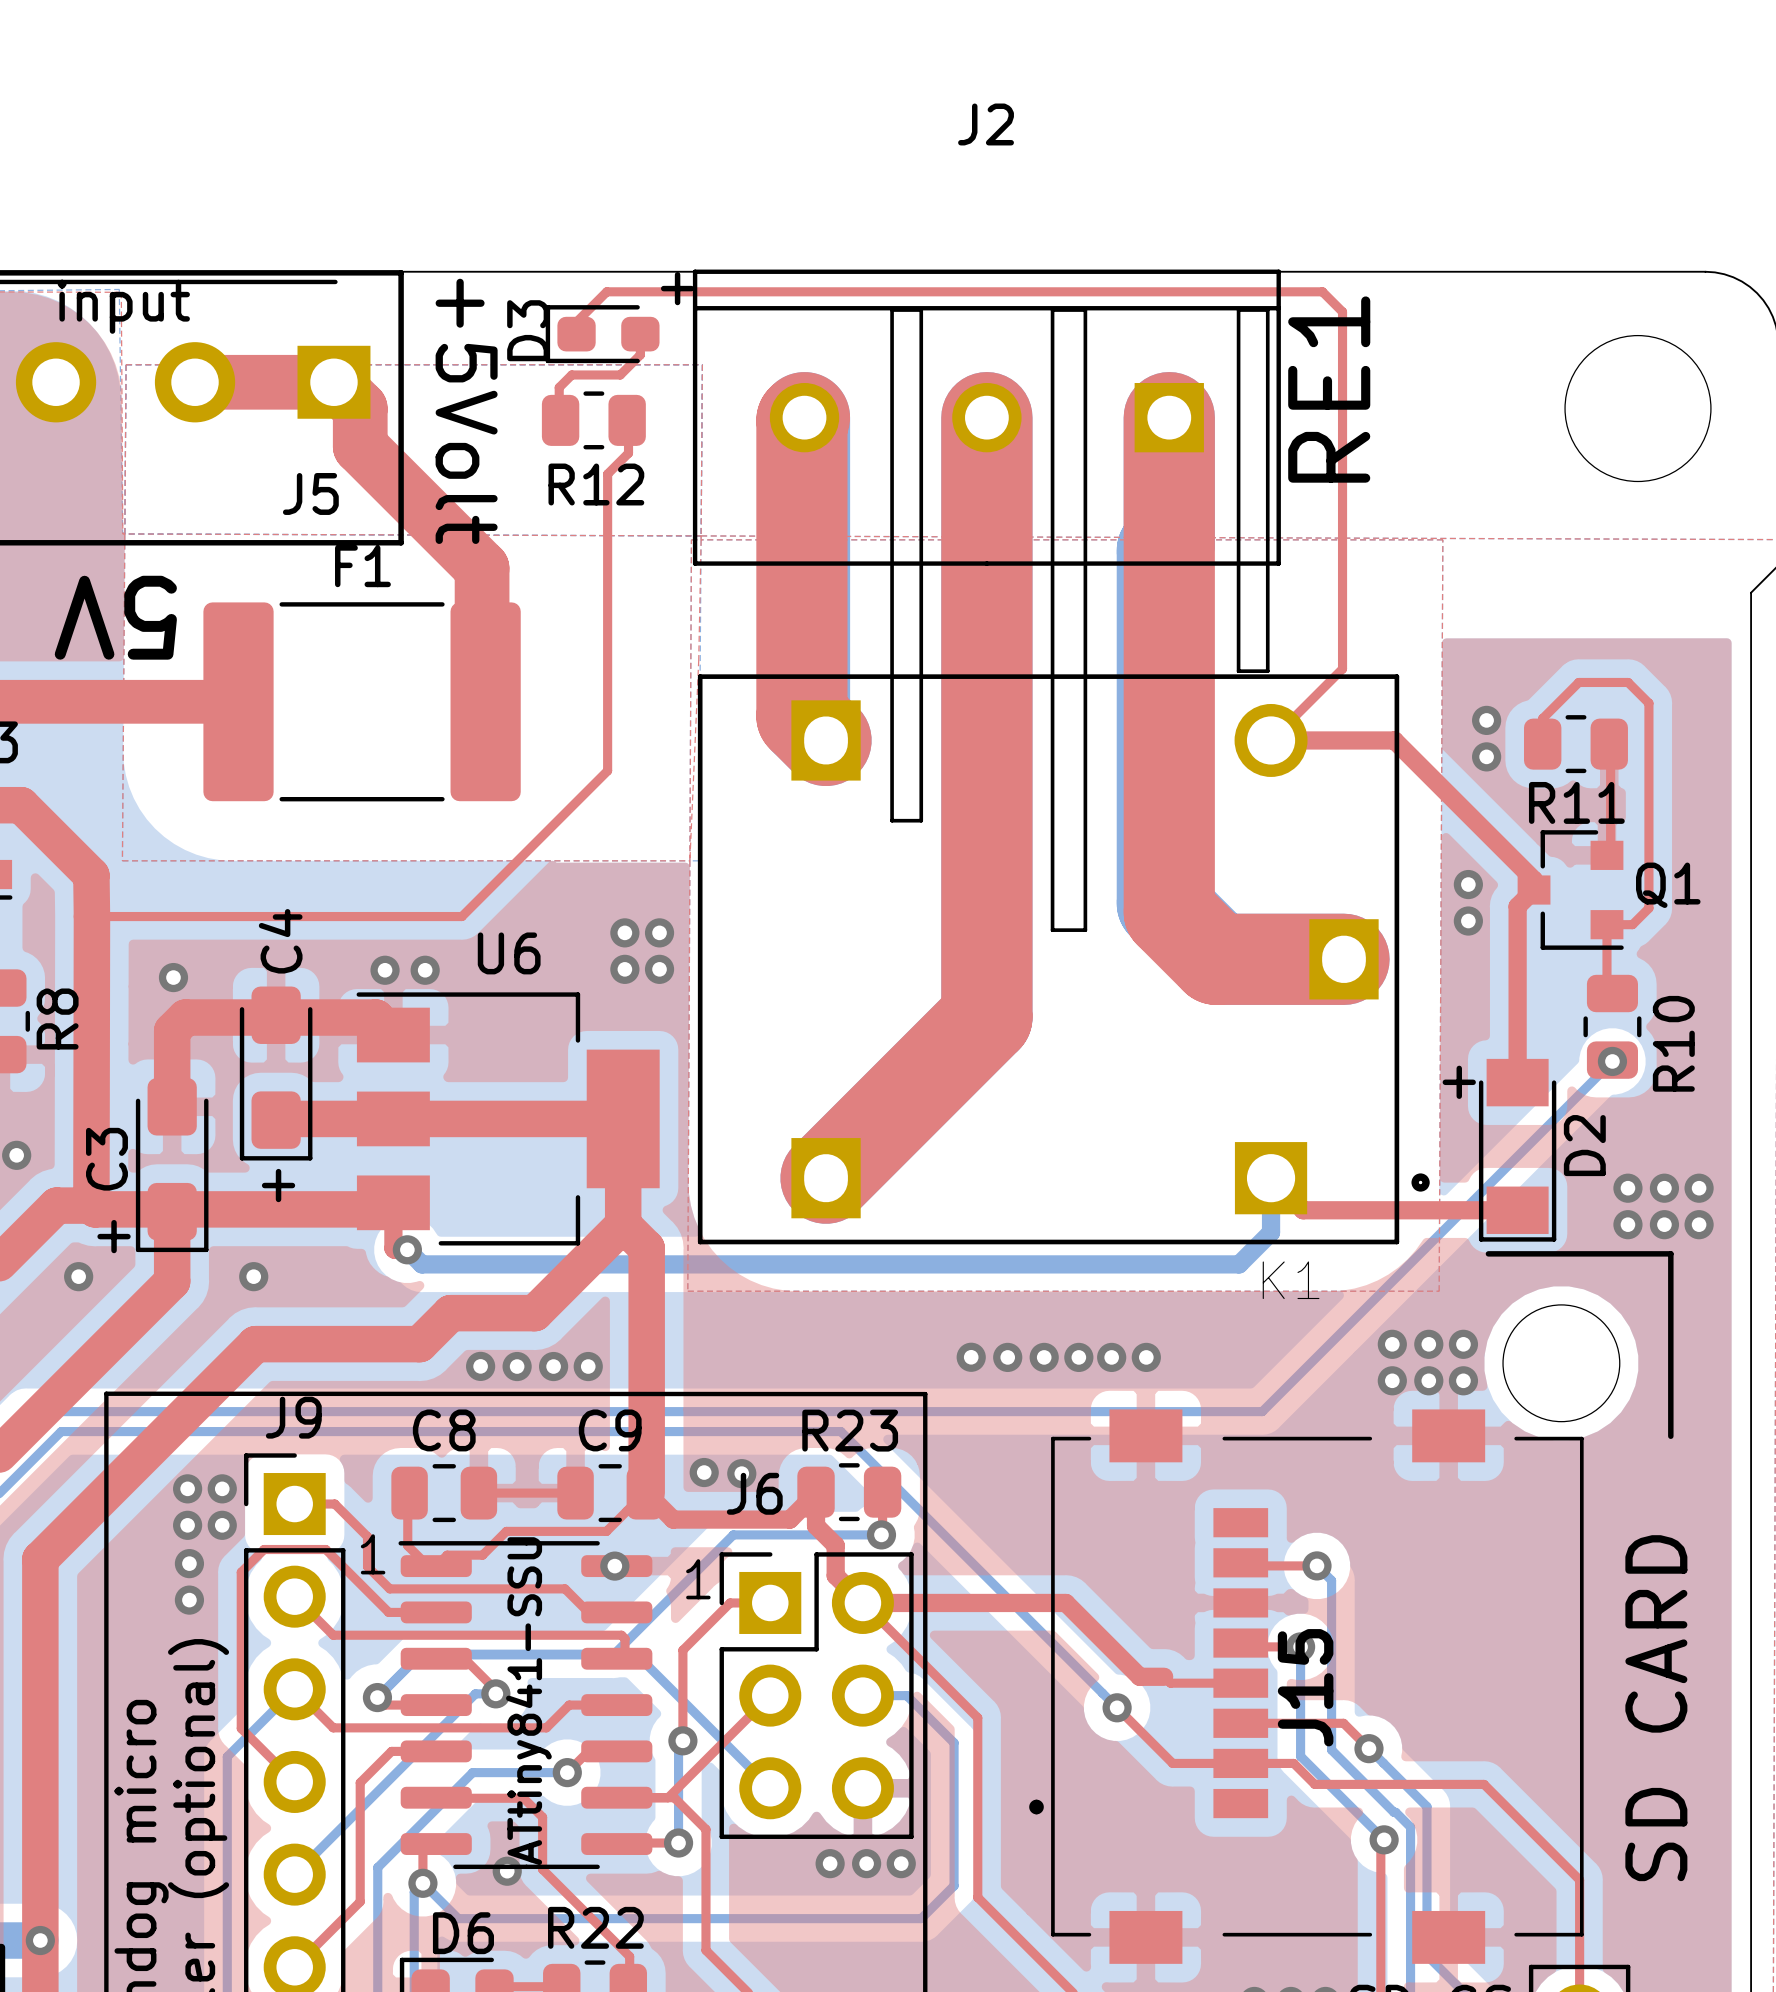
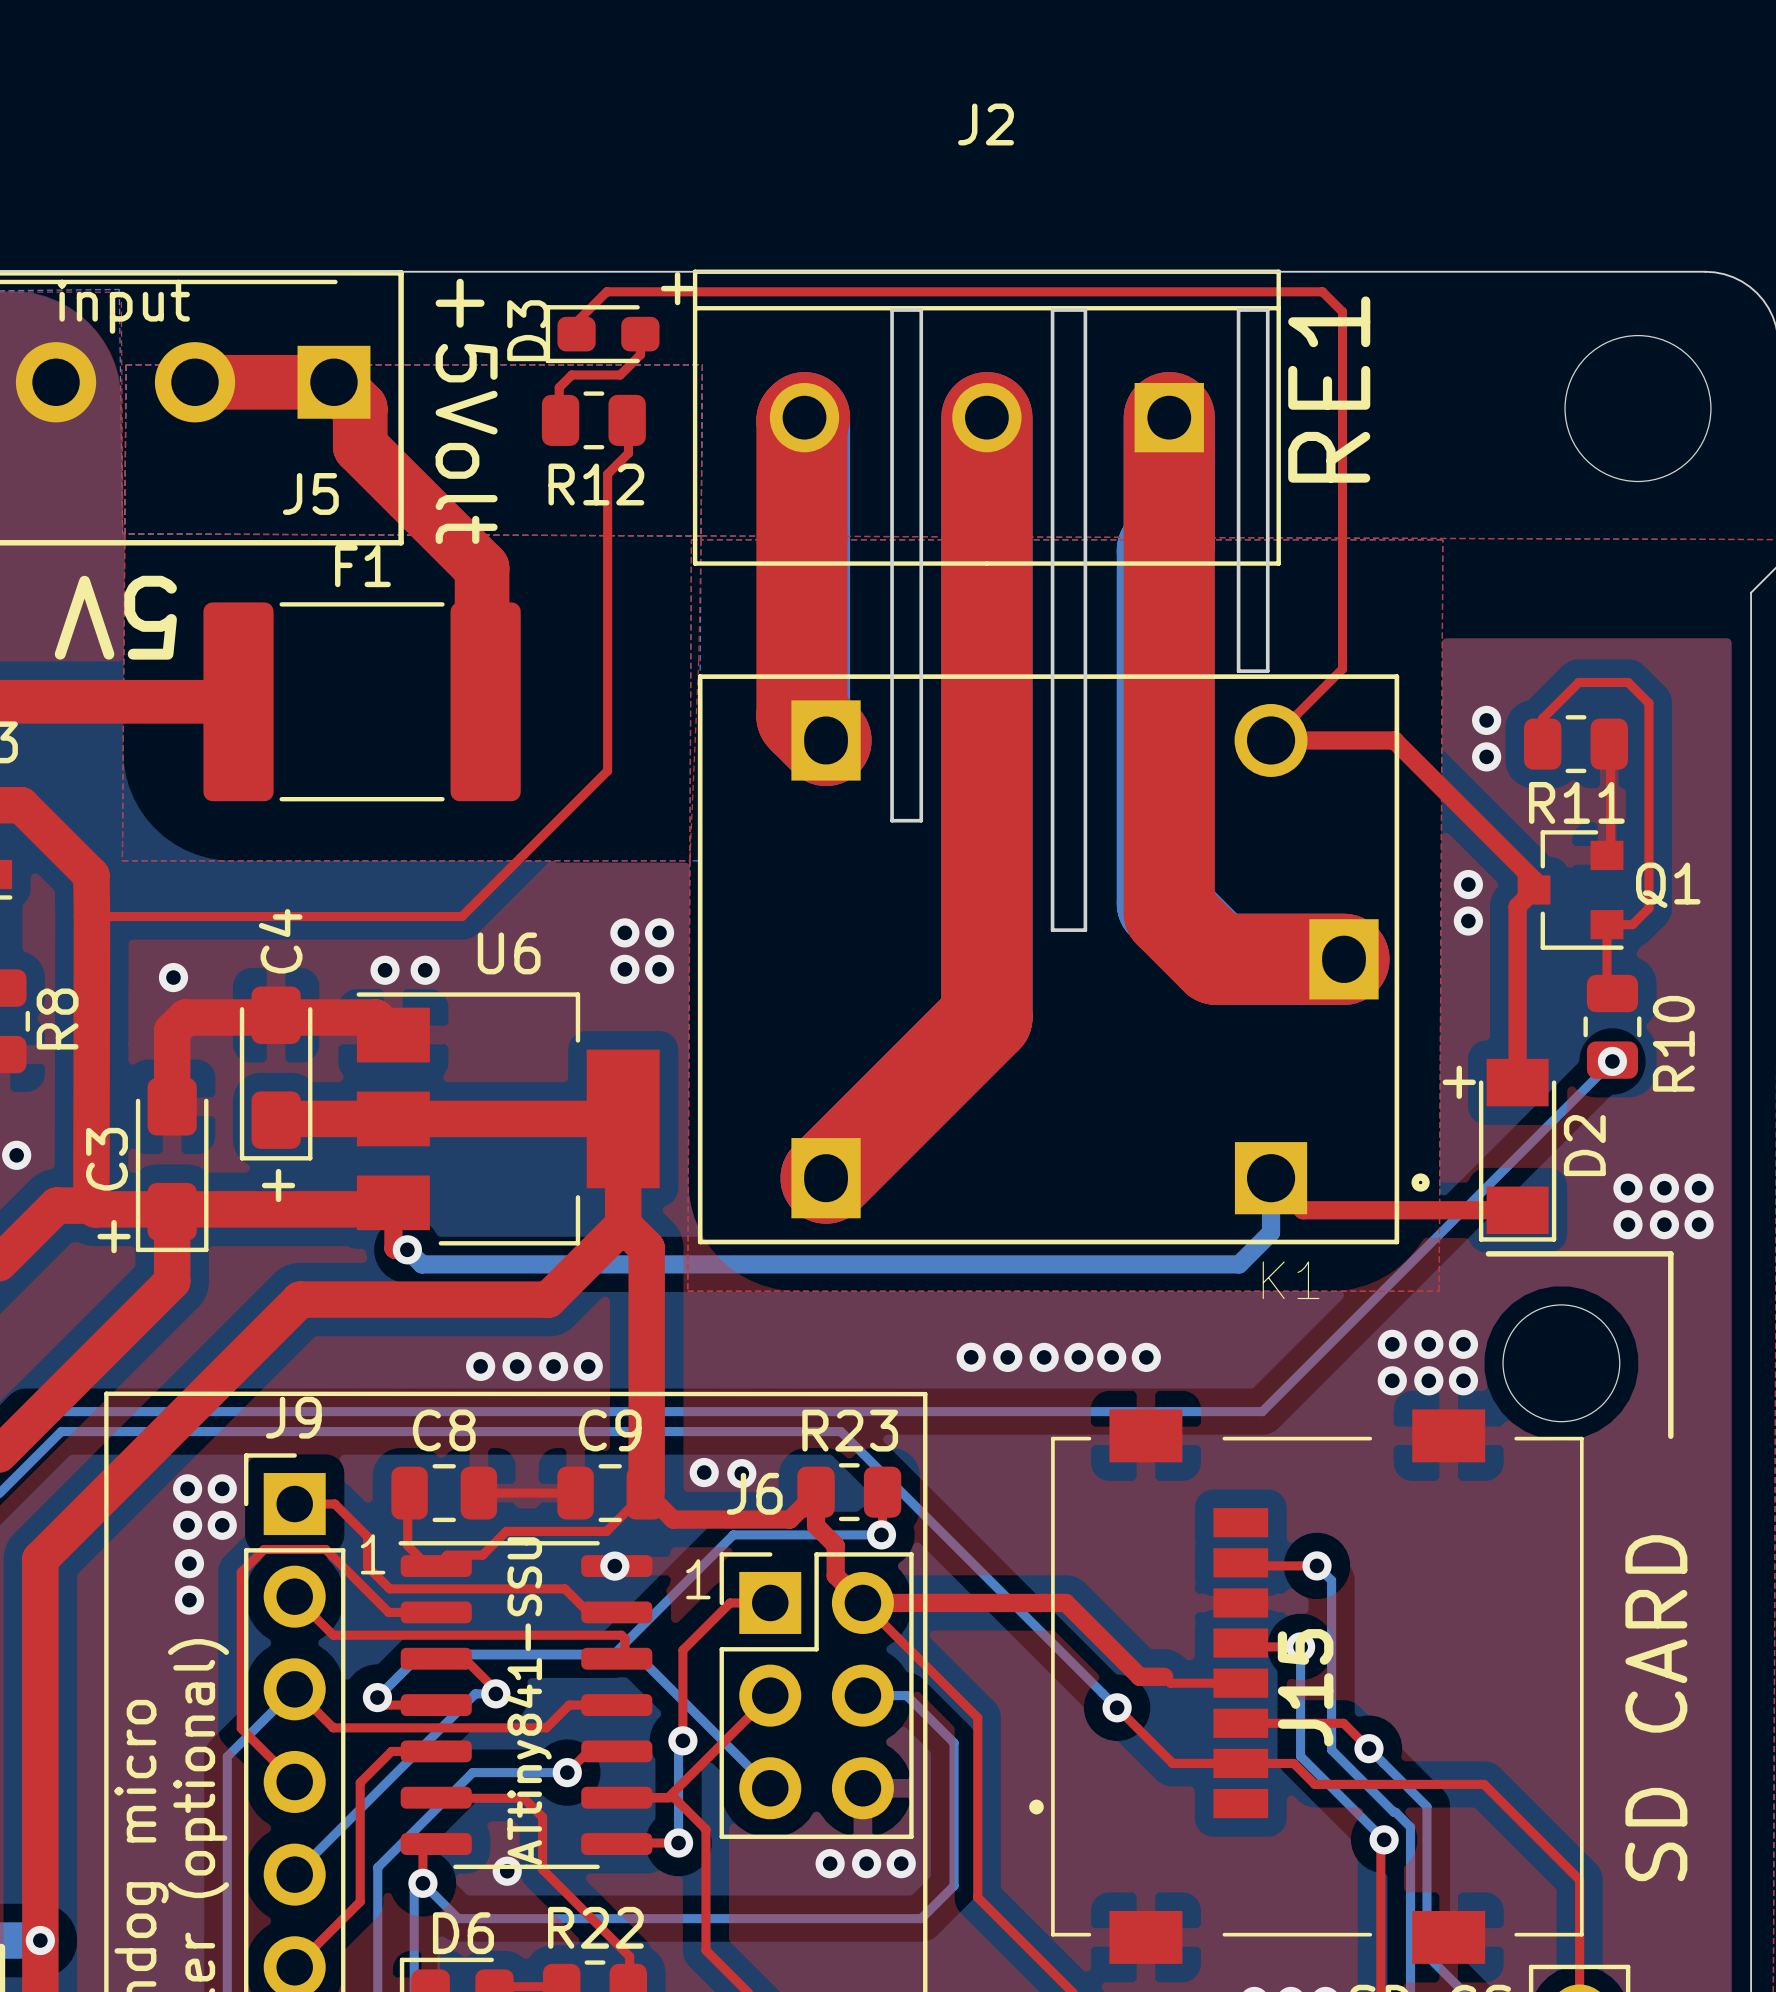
via: (78, 1276) -> none
via: (253, 1276) -> none
top track: (548, 1299) (534, 1313) (450, 1313) (419, 1344) (255, 1344) -> (548, 1299) (300, 1299) (255, 1344)

